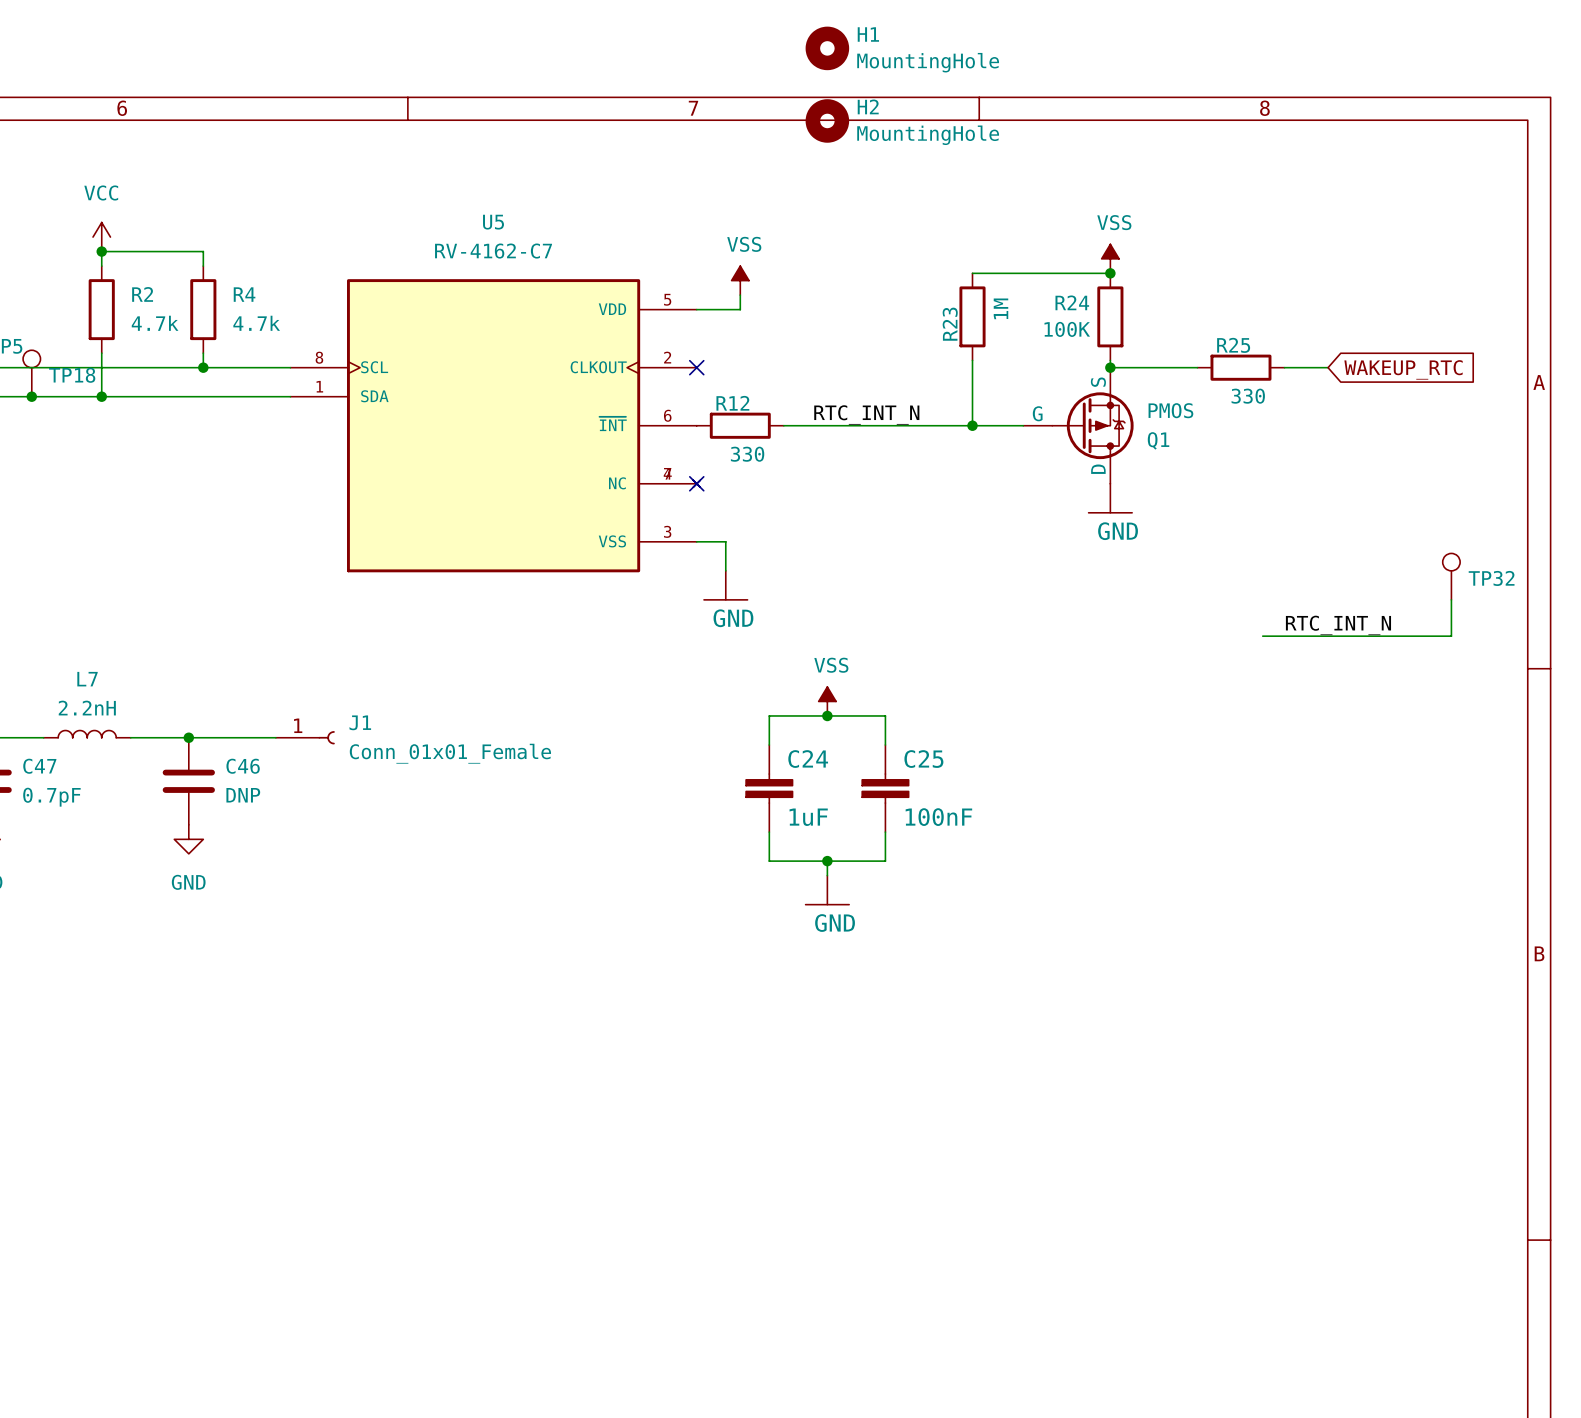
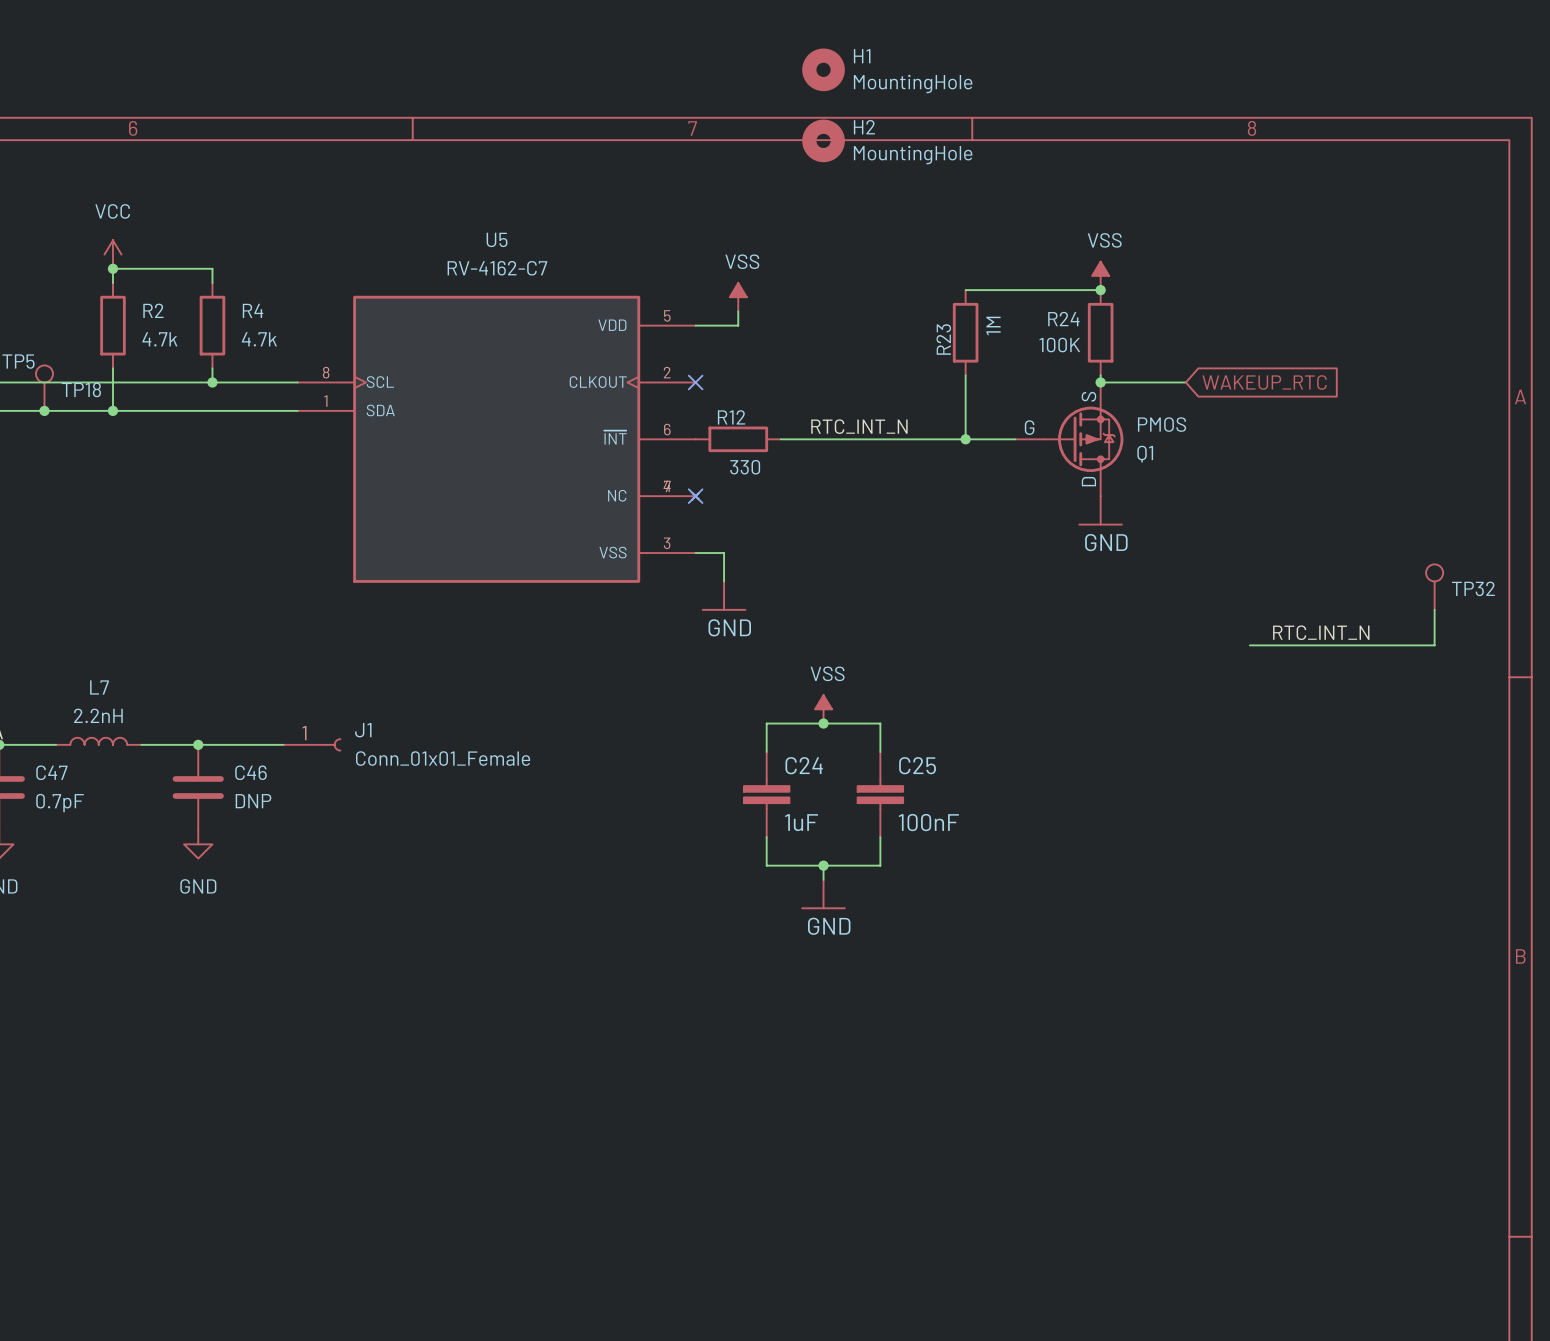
R25: 330 (1240, 367) -> none
wire: (1284, 367) (1328, 367) -> none
global label position: WAKEUP_RTC (1403, 369) -> WAKEUP_RTC (1264, 382)

